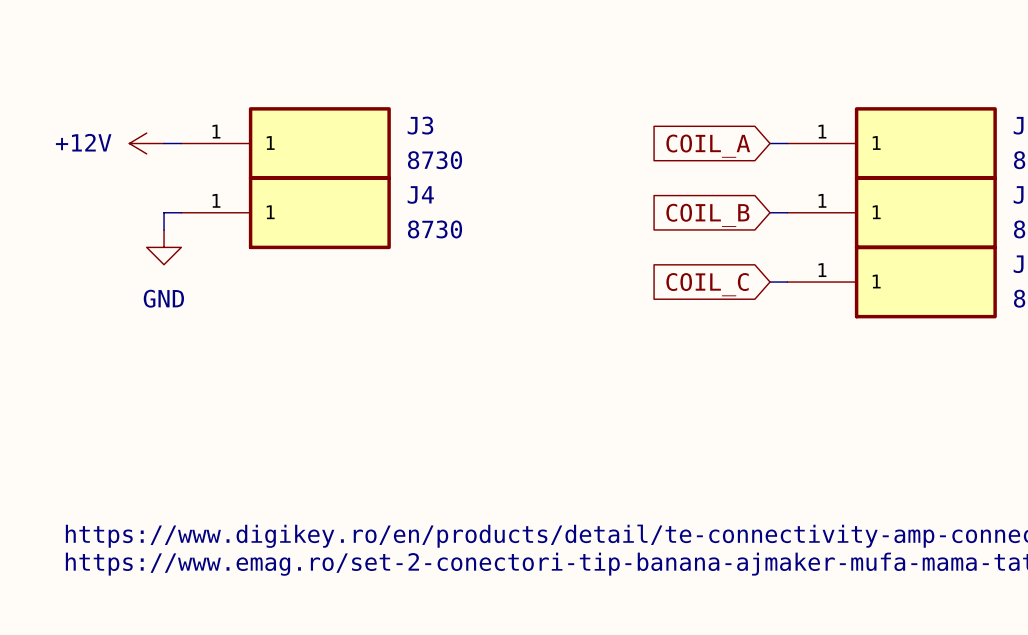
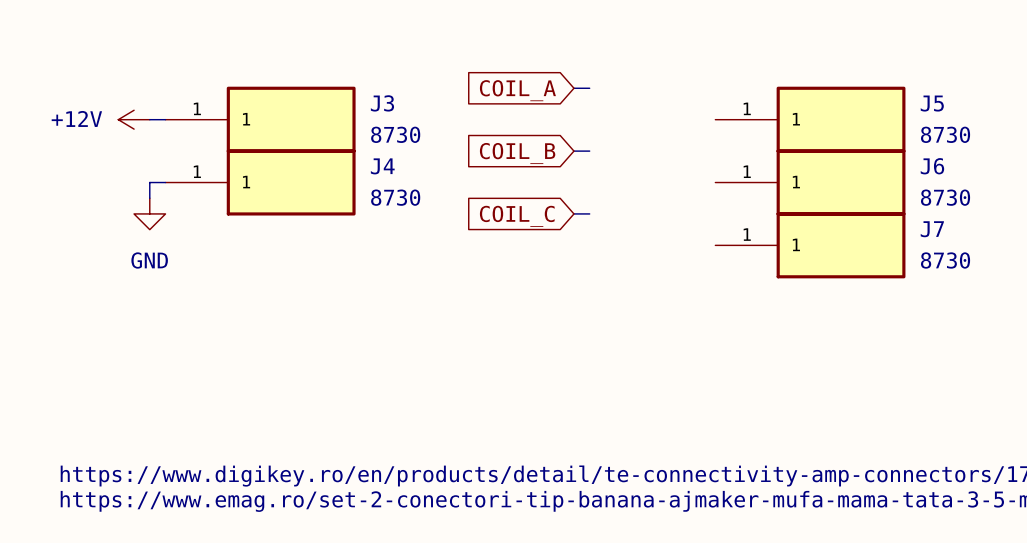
wire: (770, 143) (787, 143) -> (573, 88) (589, 88)
global label position: COIL_A (708, 146) -> COIL_A (517, 90)
wire: (770, 212) (787, 212) -> (573, 151) (589, 151)
global label position: COIL_B (707, 215) -> COIL_B (517, 153)
wire: (770, 282) (787, 282) -> (573, 213) (589, 213)
global label position: COIL_C (707, 284) -> COIL_C (517, 216)

